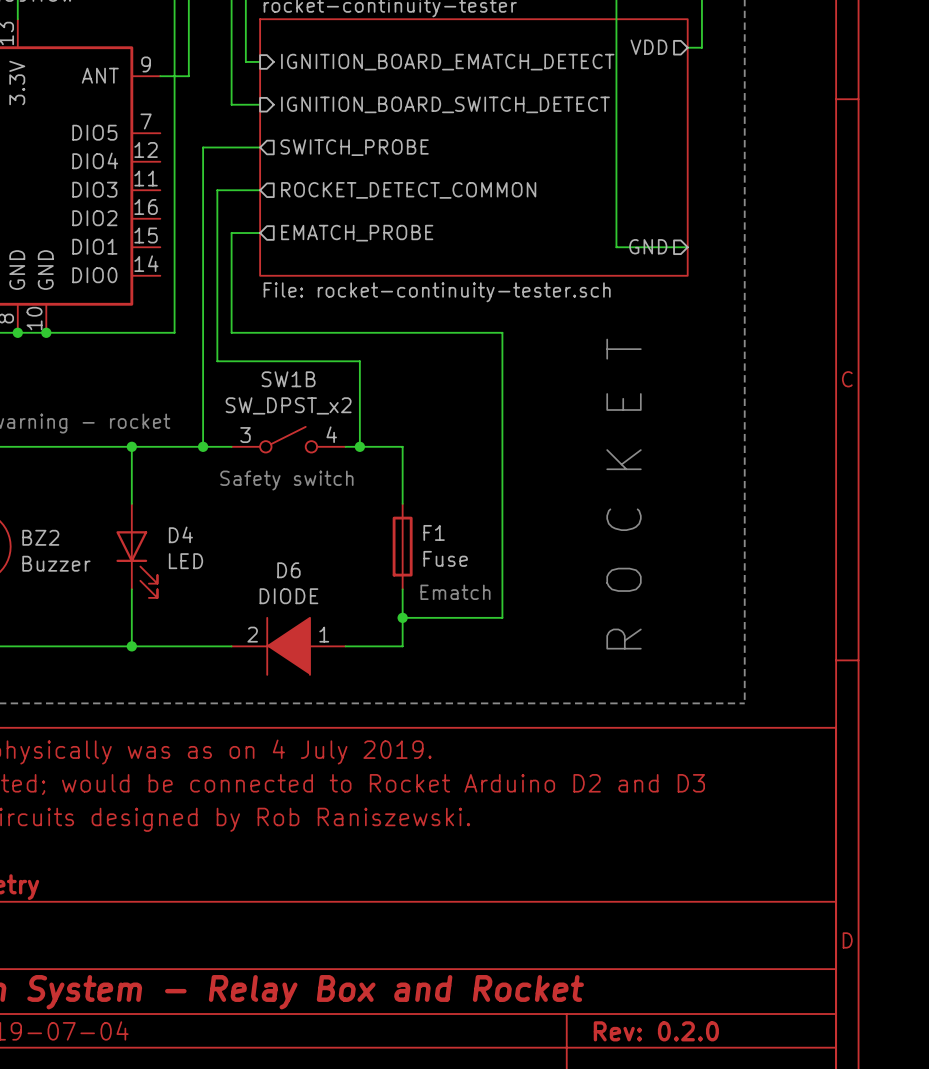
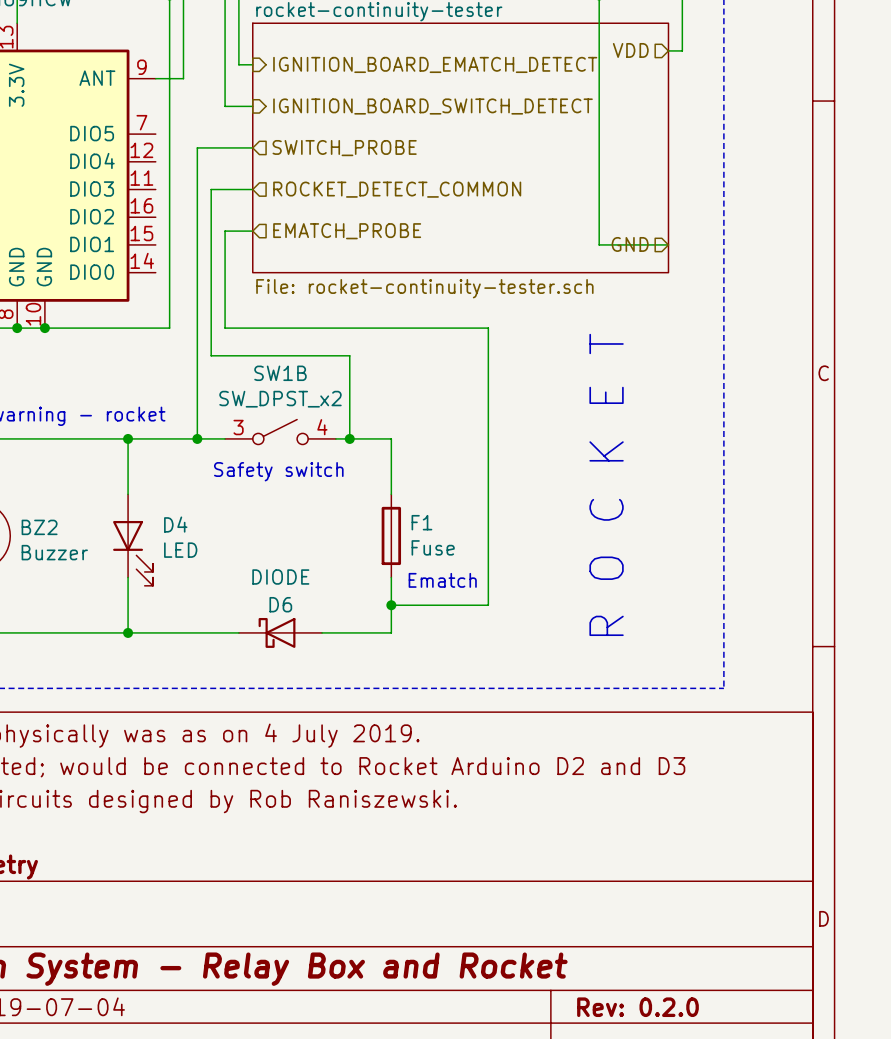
D6 name position: D6 (288, 570) -> D6 (280, 604)
D6 symbol: [231, 617, 346, 675] -> [238, 617, 323, 648]

